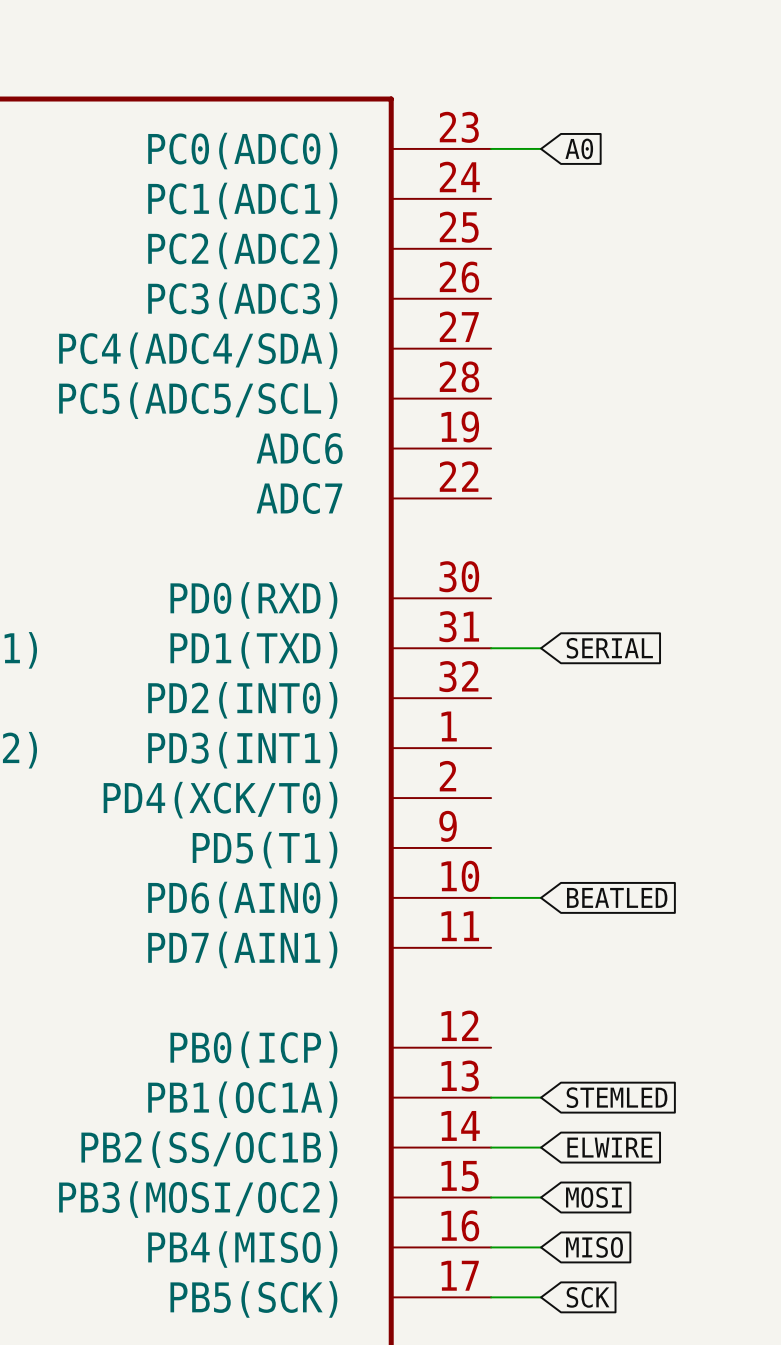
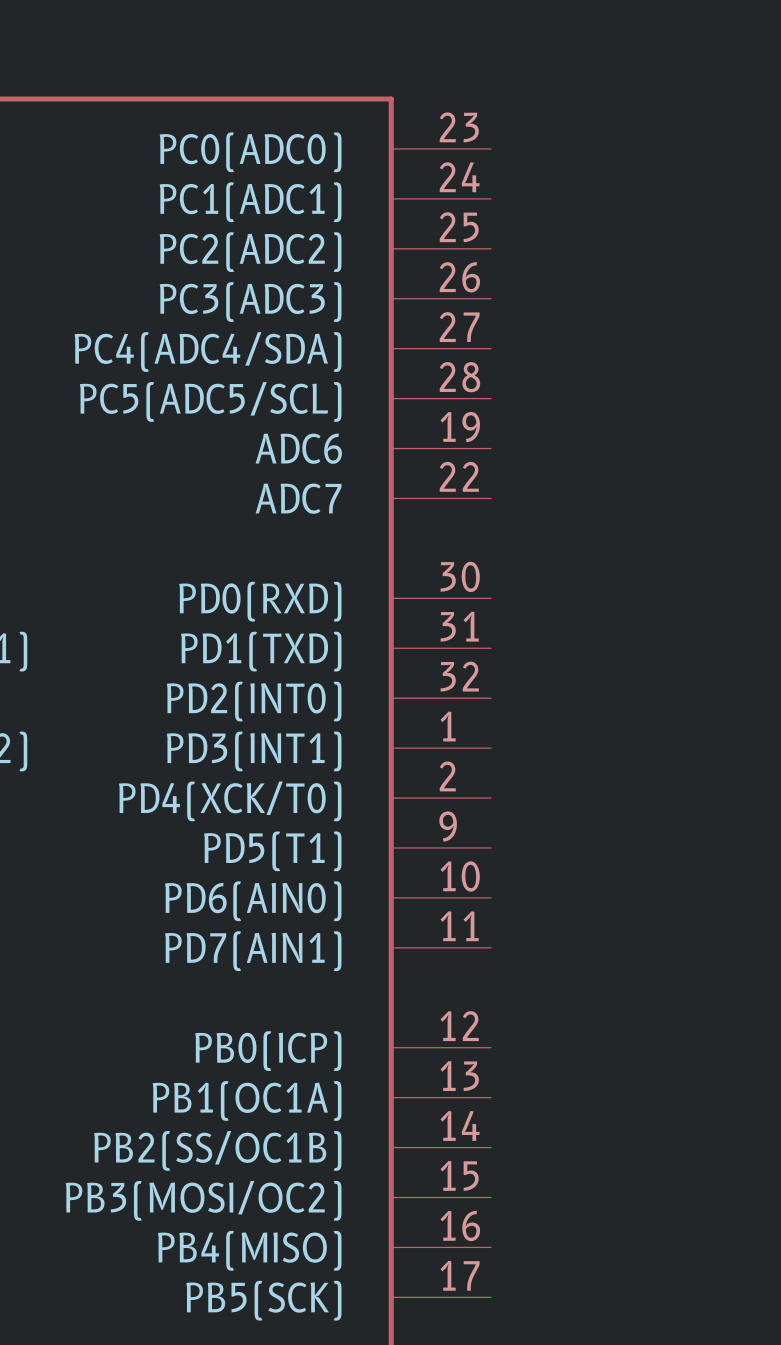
wire: (491, 148) (541, 148) -> none
global label: A0 (579, 148) -> none
wire: (491, 648) (541, 648) -> none
global label: SERIAL (609, 648) -> none
wire: (491, 897) (541, 897) -> none
global label: BEATLED (617, 897) -> none
wire: (491, 1097) (541, 1097) -> none
global label: STEMLED (617, 1097) -> none
wire: (491, 1147) (541, 1147) -> none
global label: ELWIRE (609, 1147) -> none
wire: (491, 1197) (541, 1197) -> none
global label: MOSI (593, 1197) -> none
wire: (491, 1247) (541, 1247) -> none
global label: MISO (594, 1247) -> none
wire: (491, 1297) (541, 1297) -> none
global label: SCK (588, 1297) -> none

